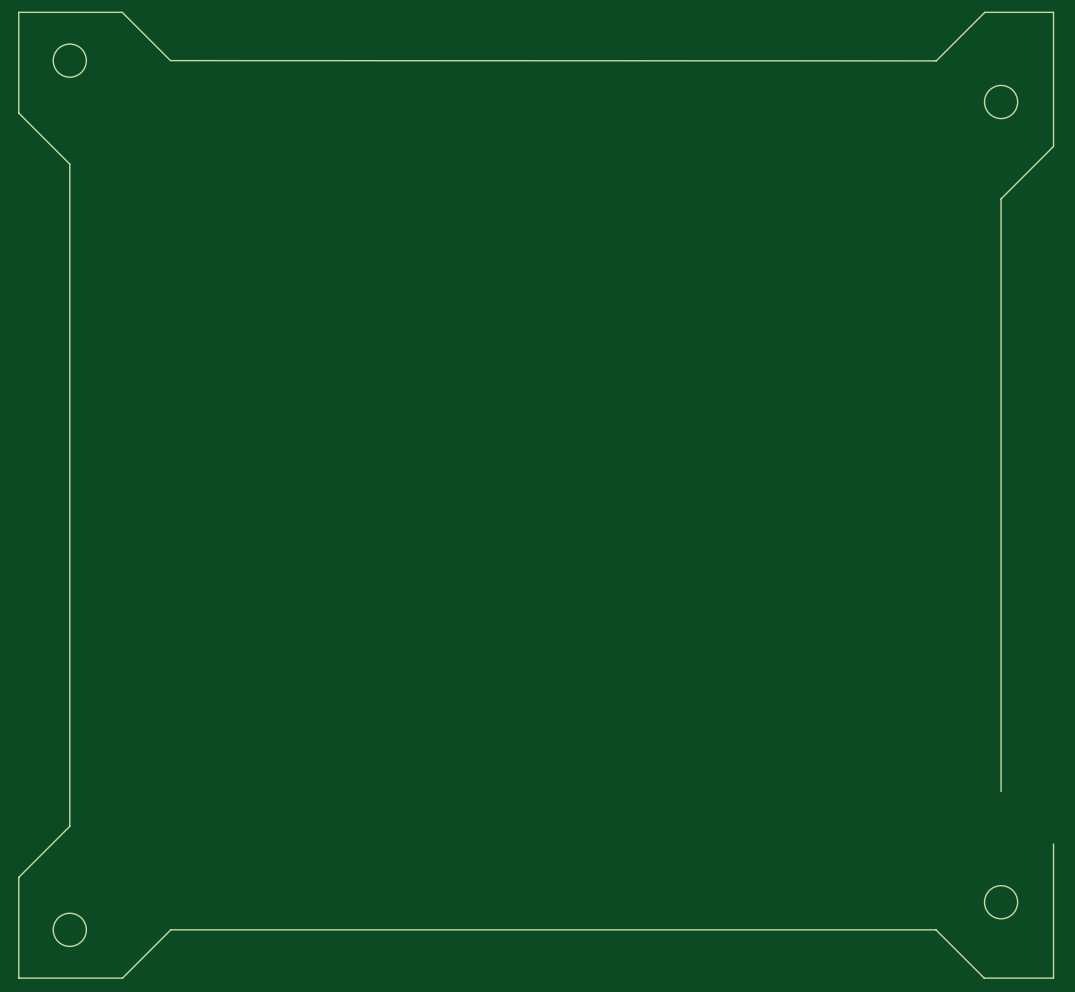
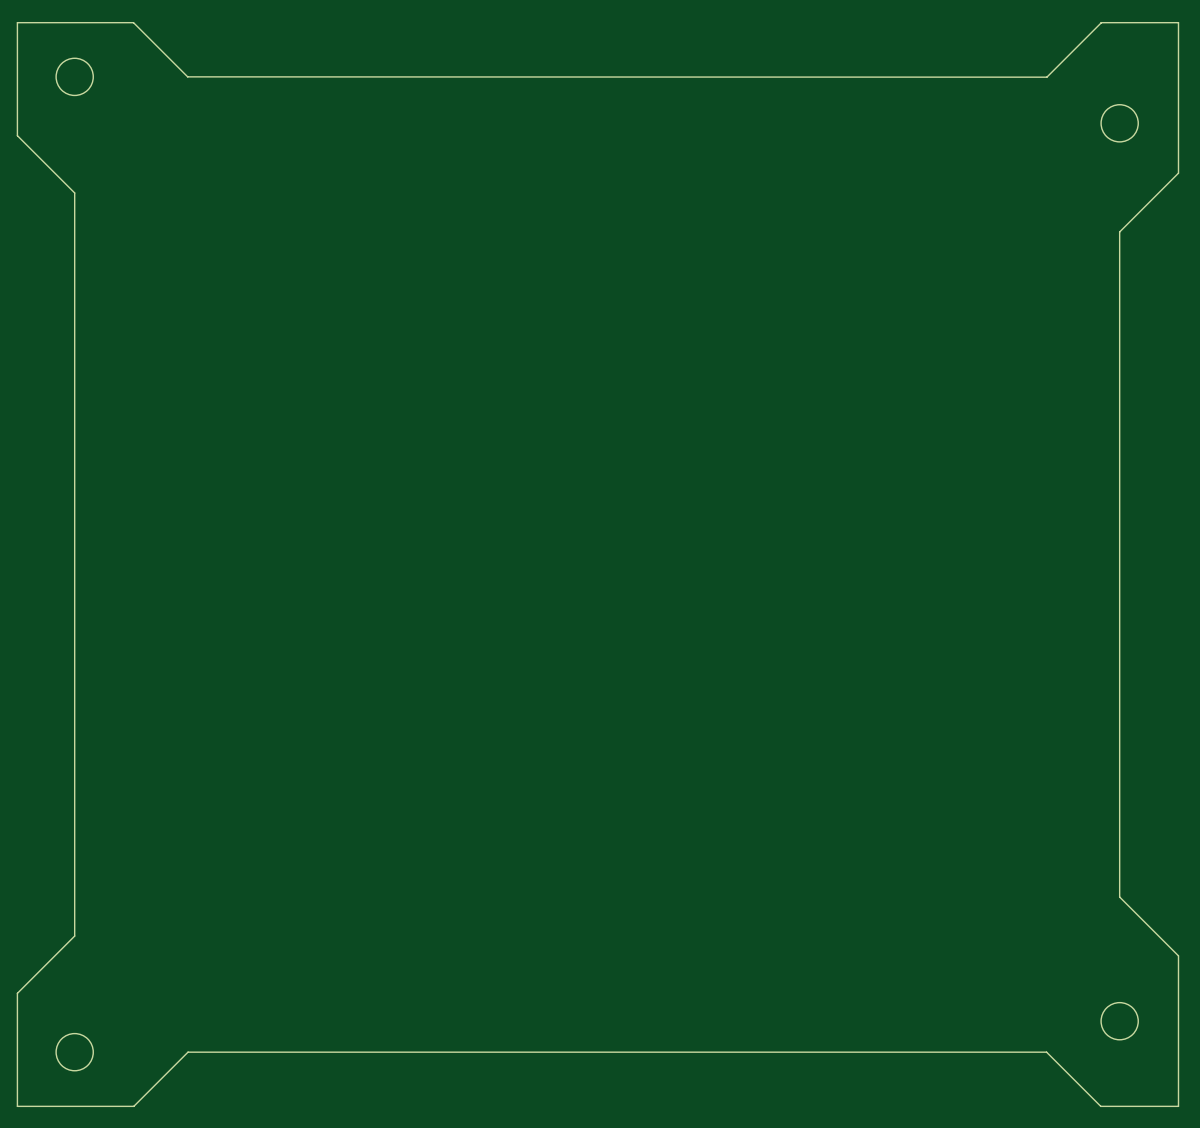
board edge: none -> (1119, 897) (1178, 955)

